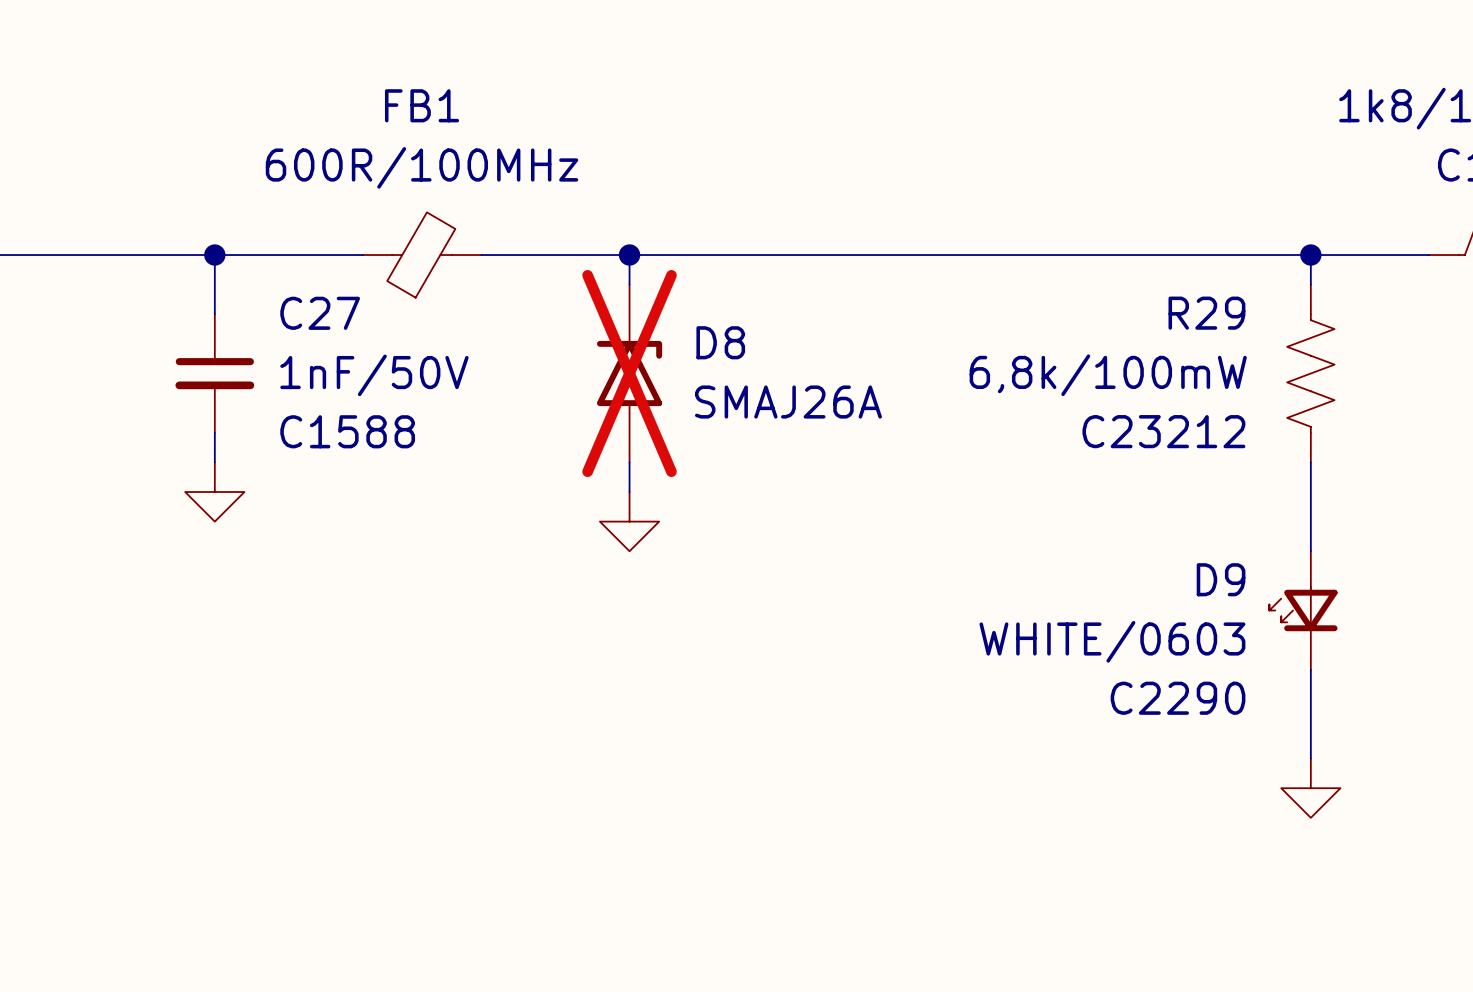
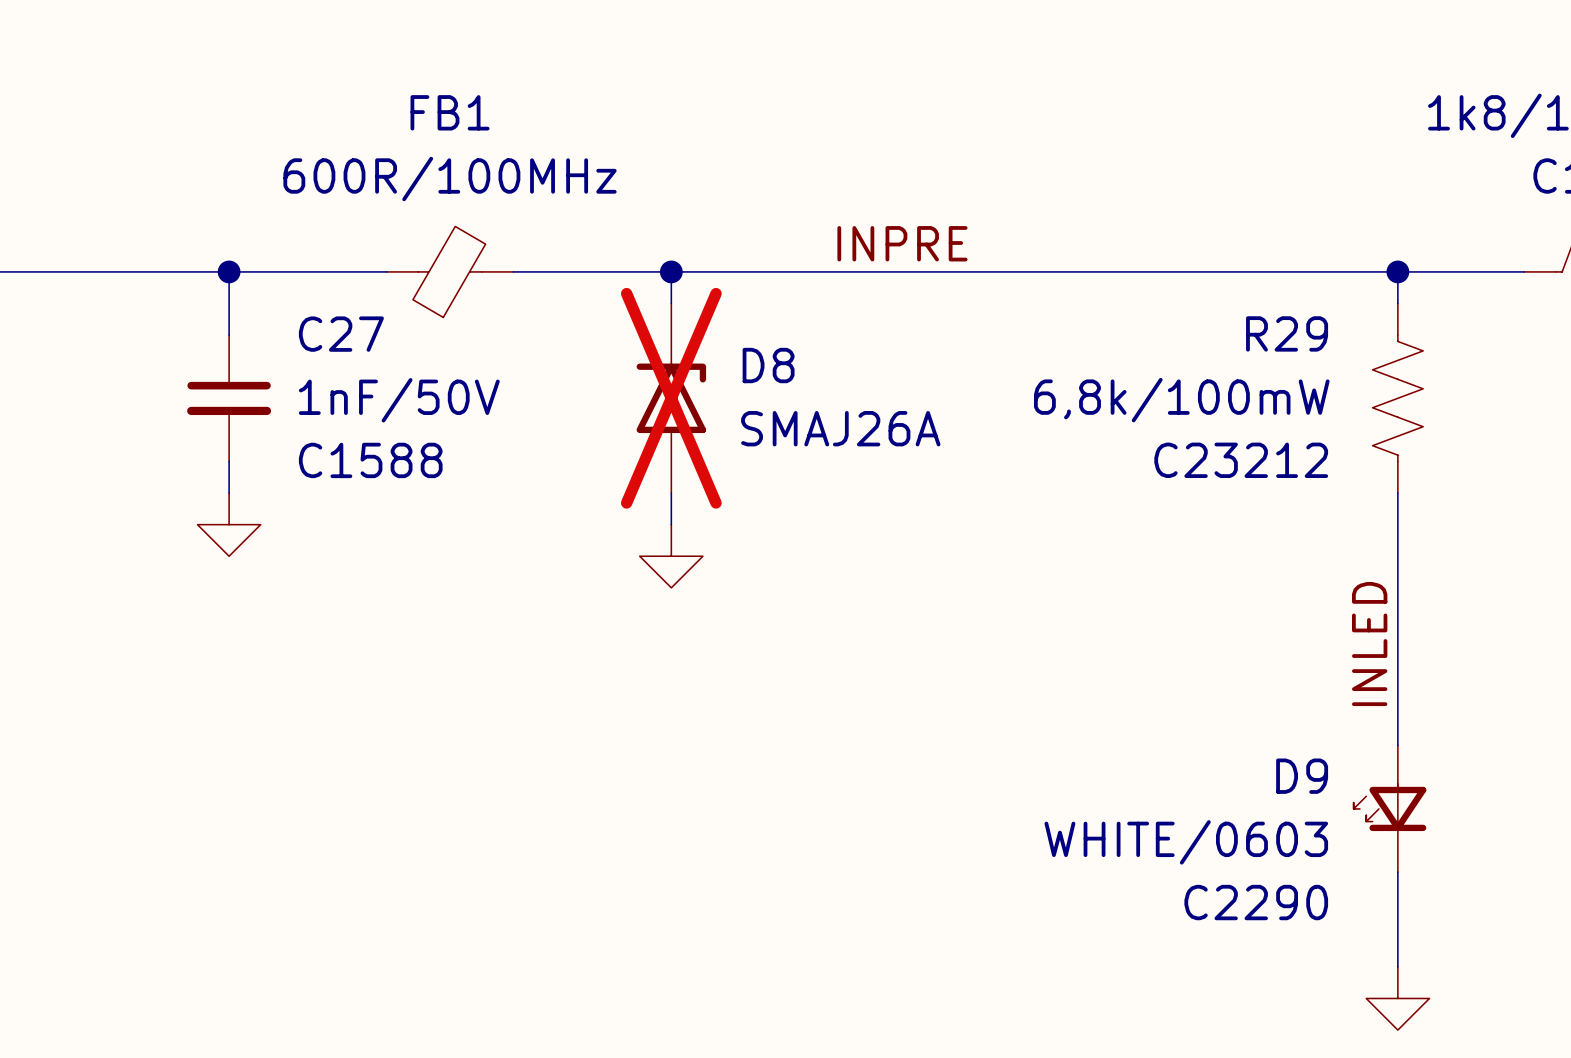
label: none -> INPRE (902, 243)
label: none -> INLED (1369, 644)
D9 position: (1303, 610) -> (1389, 808)
power symbol position: (1310, 788) -> (1397, 998)
wire: none -> (1397, 872) (1397, 966)

